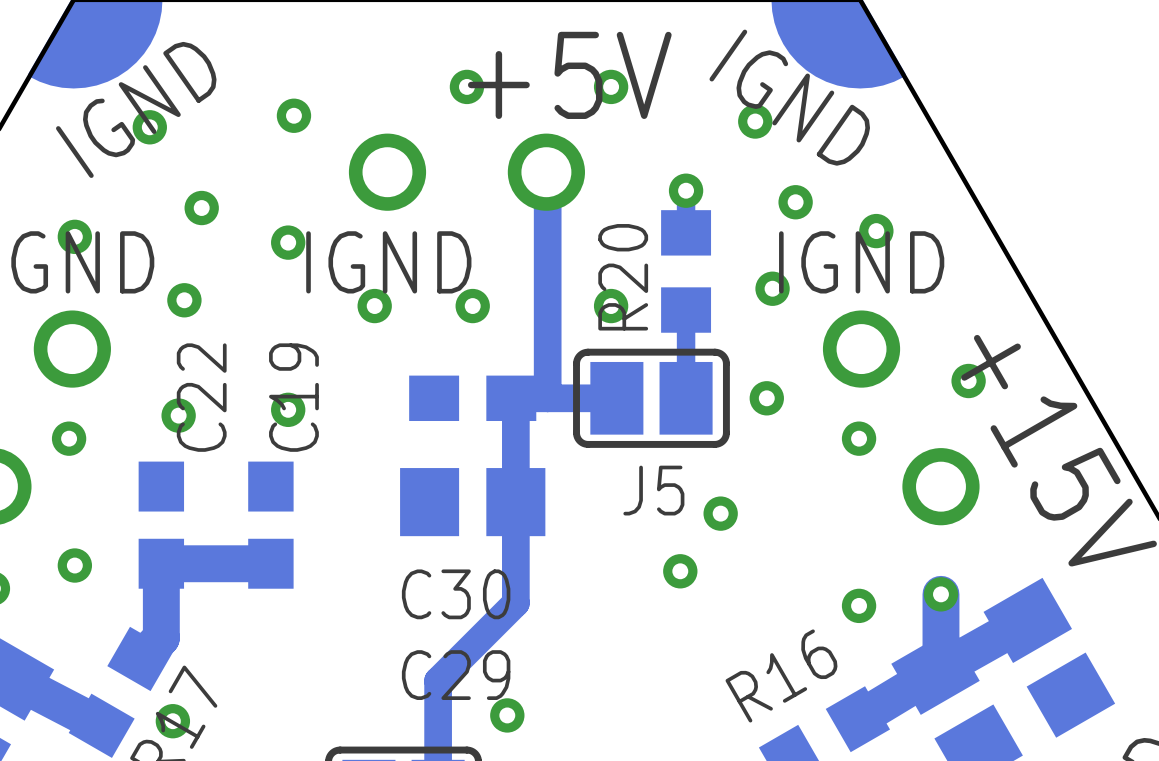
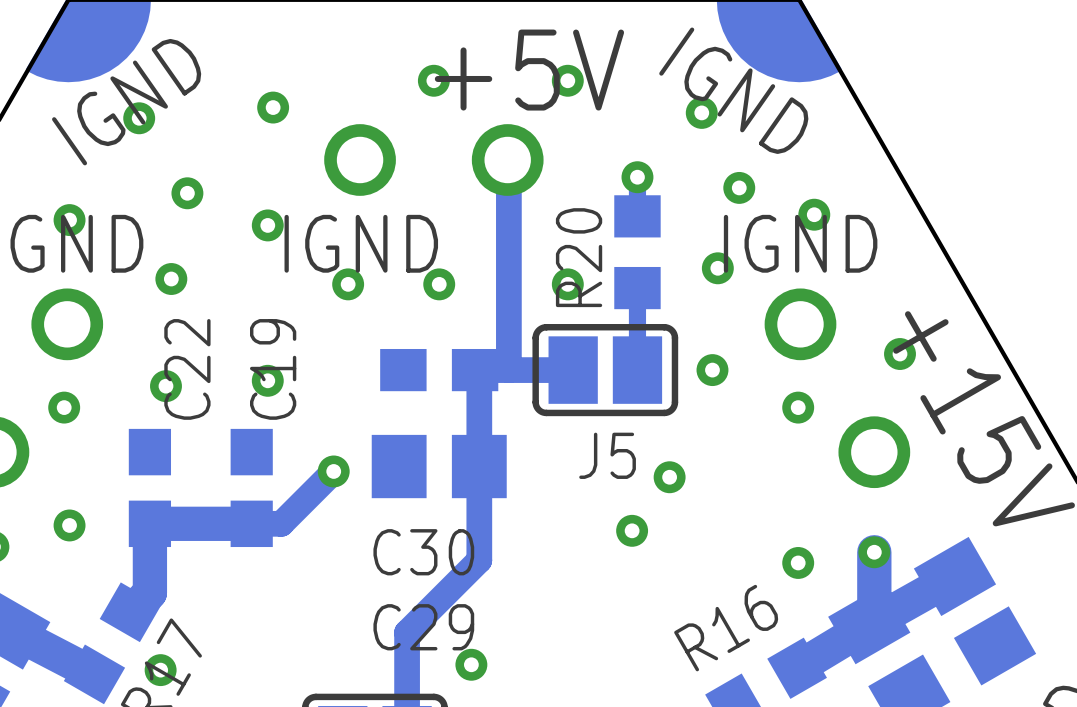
track: none -> (333, 471) (281, 523) (251, 523)
via: none -> (333, 471)

